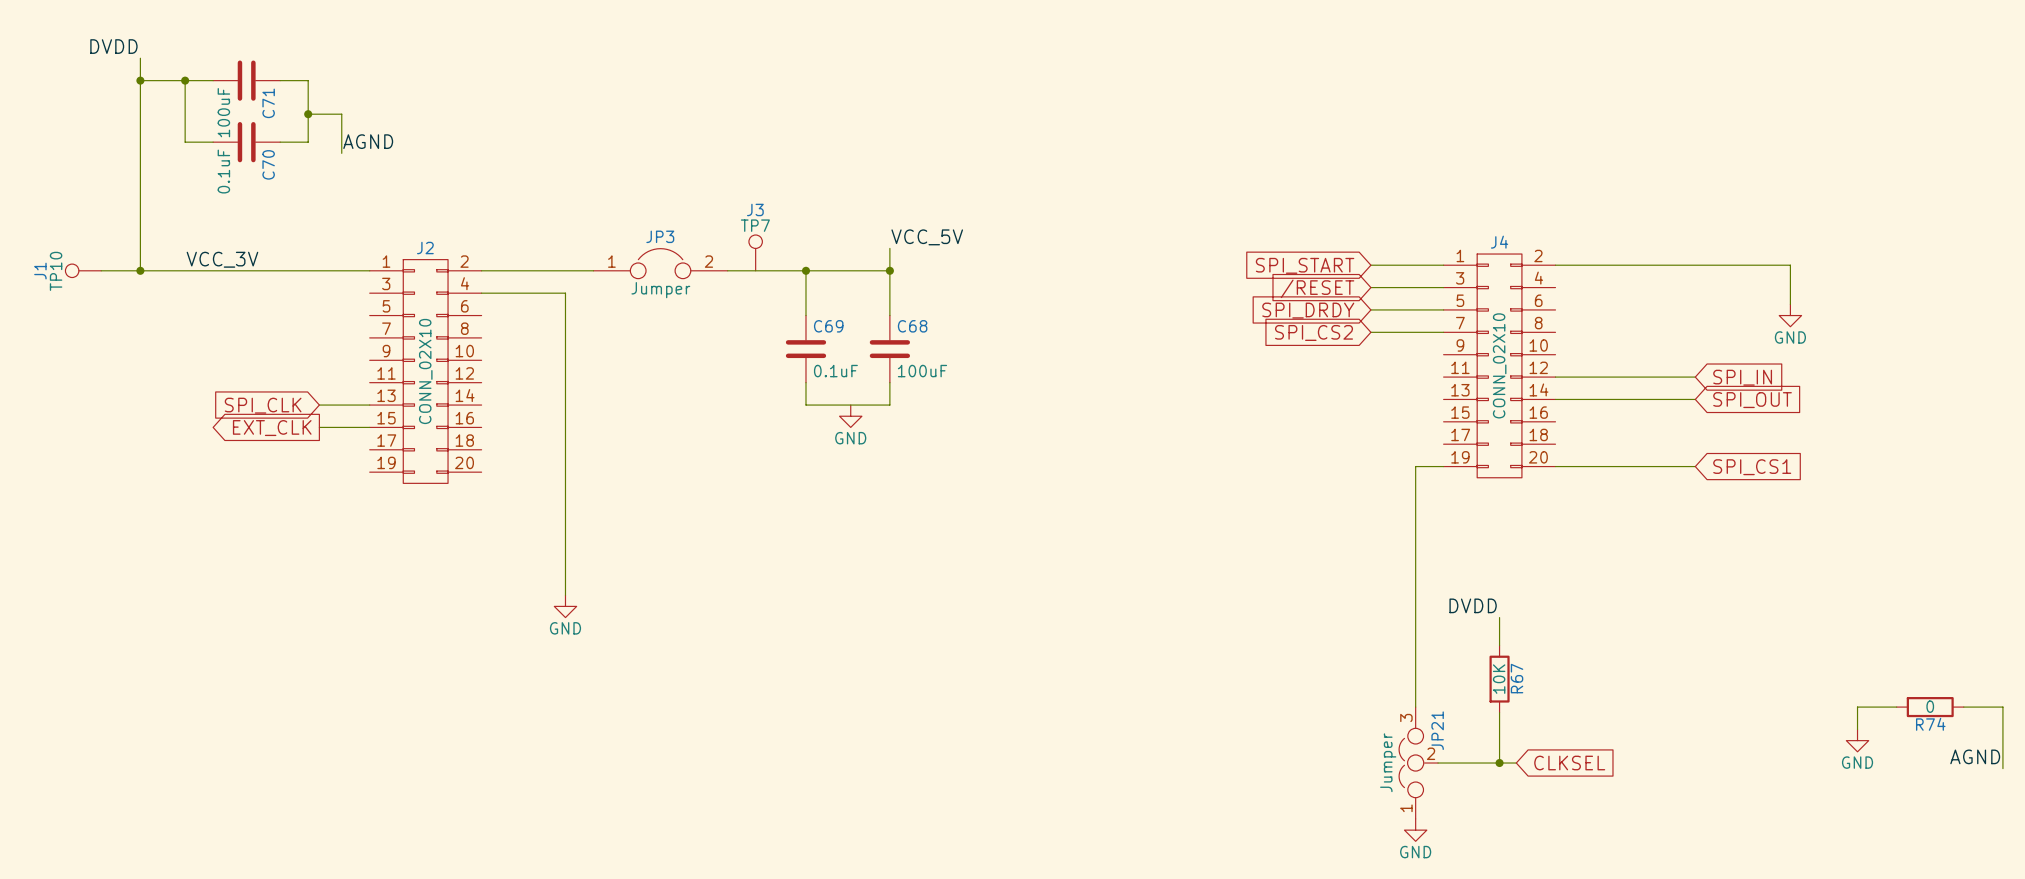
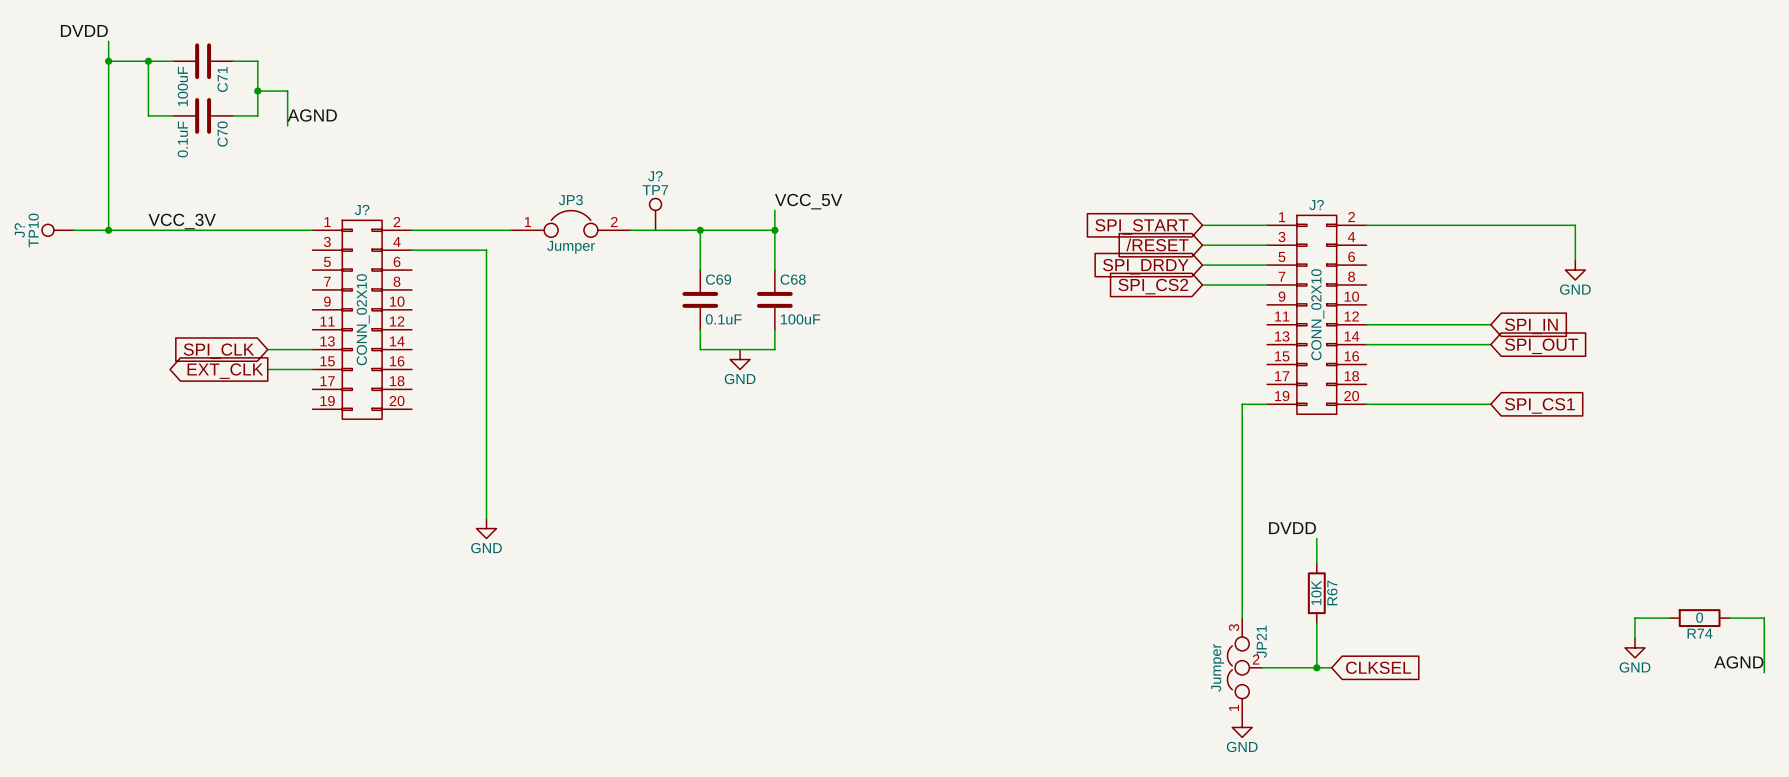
J3 name: J3 (755, 209) -> J? (655, 176)
J4 name: J4 (1499, 242) -> J? (1316, 205)
J2 name: J2 (425, 248) -> J? (362, 210)
J1 name: J1 (40, 271) -> J? (19, 230)

